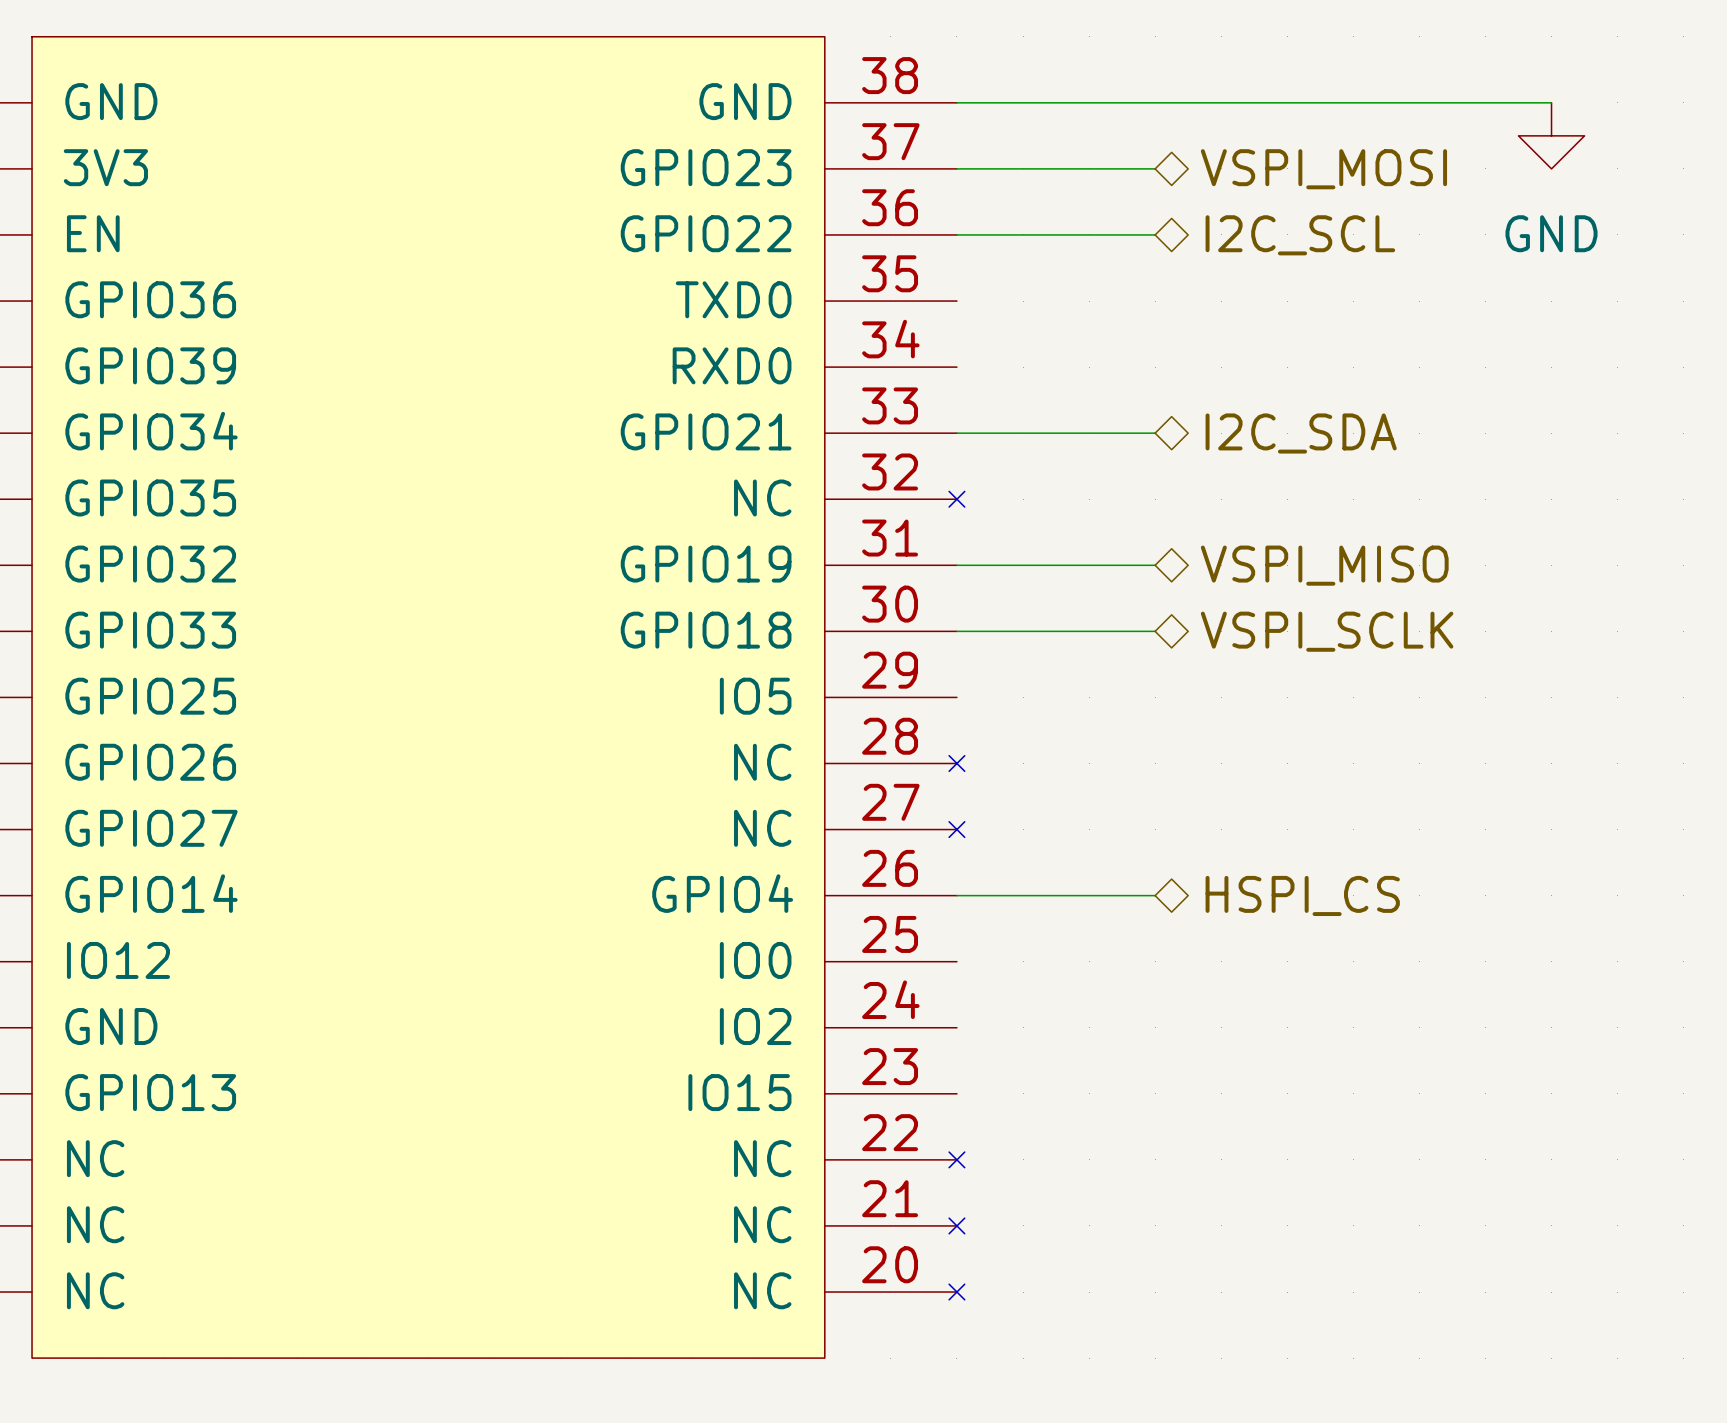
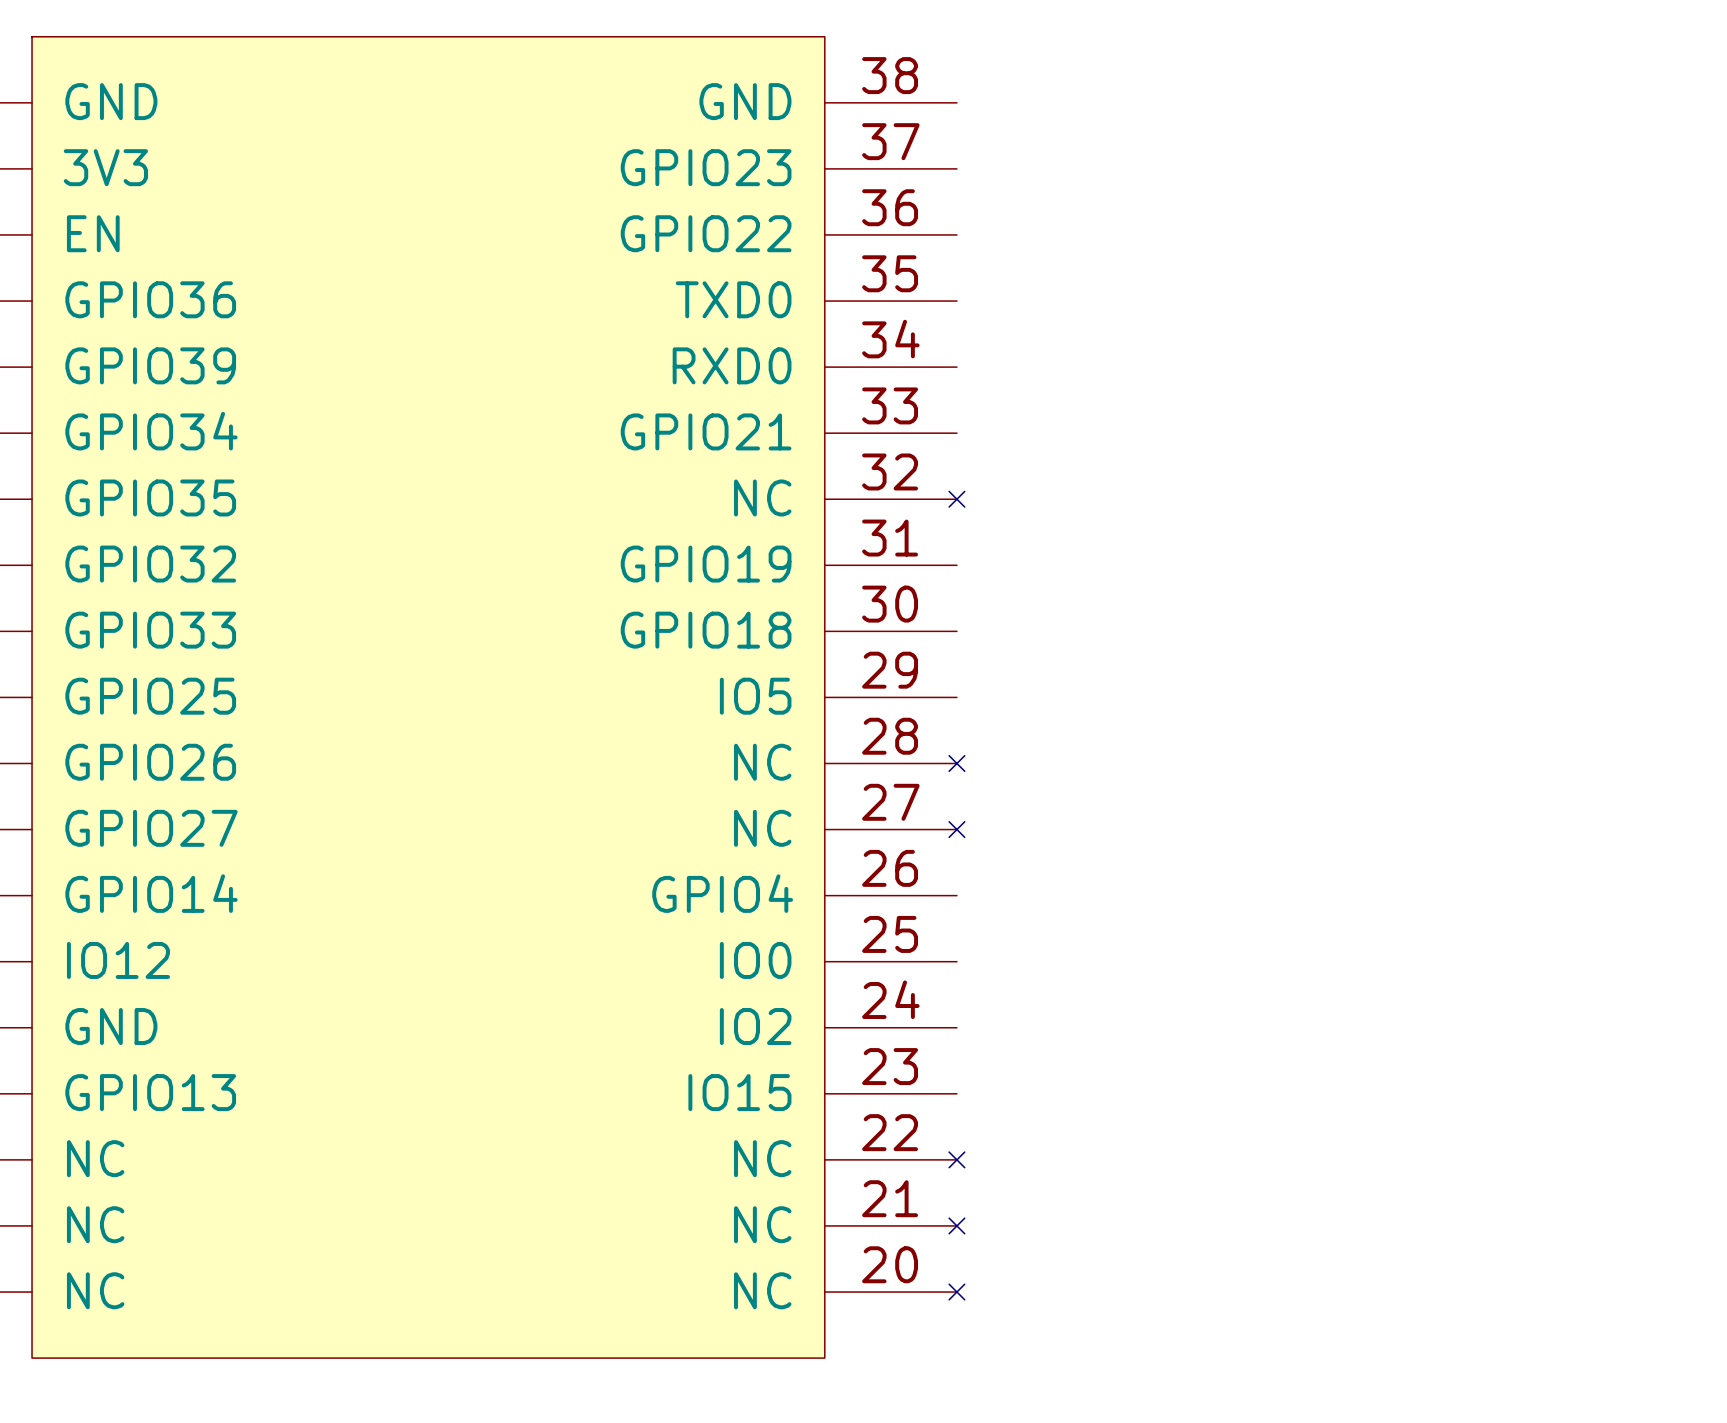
wire: (956, 102) (1551, 102) -> none
power symbol: GND (1551, 135) -> none
wire: (956, 168) (1155, 168) -> none
hierarchical label: VSPI_MOSI (1323, 169) -> none
wire: (956, 234) (1155, 234) -> none
hierarchical label: I2C_SCL (1300, 235) -> none
wire: (956, 433) (1155, 433) -> none
hierarchical label: I2C_SDA (1301, 433) -> none
wire: (956, 565) (1155, 565) -> none
hierarchical label: VSPI_MISO (1324, 565) -> none
wire: (956, 631) (1155, 631) -> none
hierarchical label: VSPI_SCLK (1327, 631) -> none
wire: (956, 895) (1155, 895) -> none
hierarchical label: HSPI_CS (1302, 895) -> none

